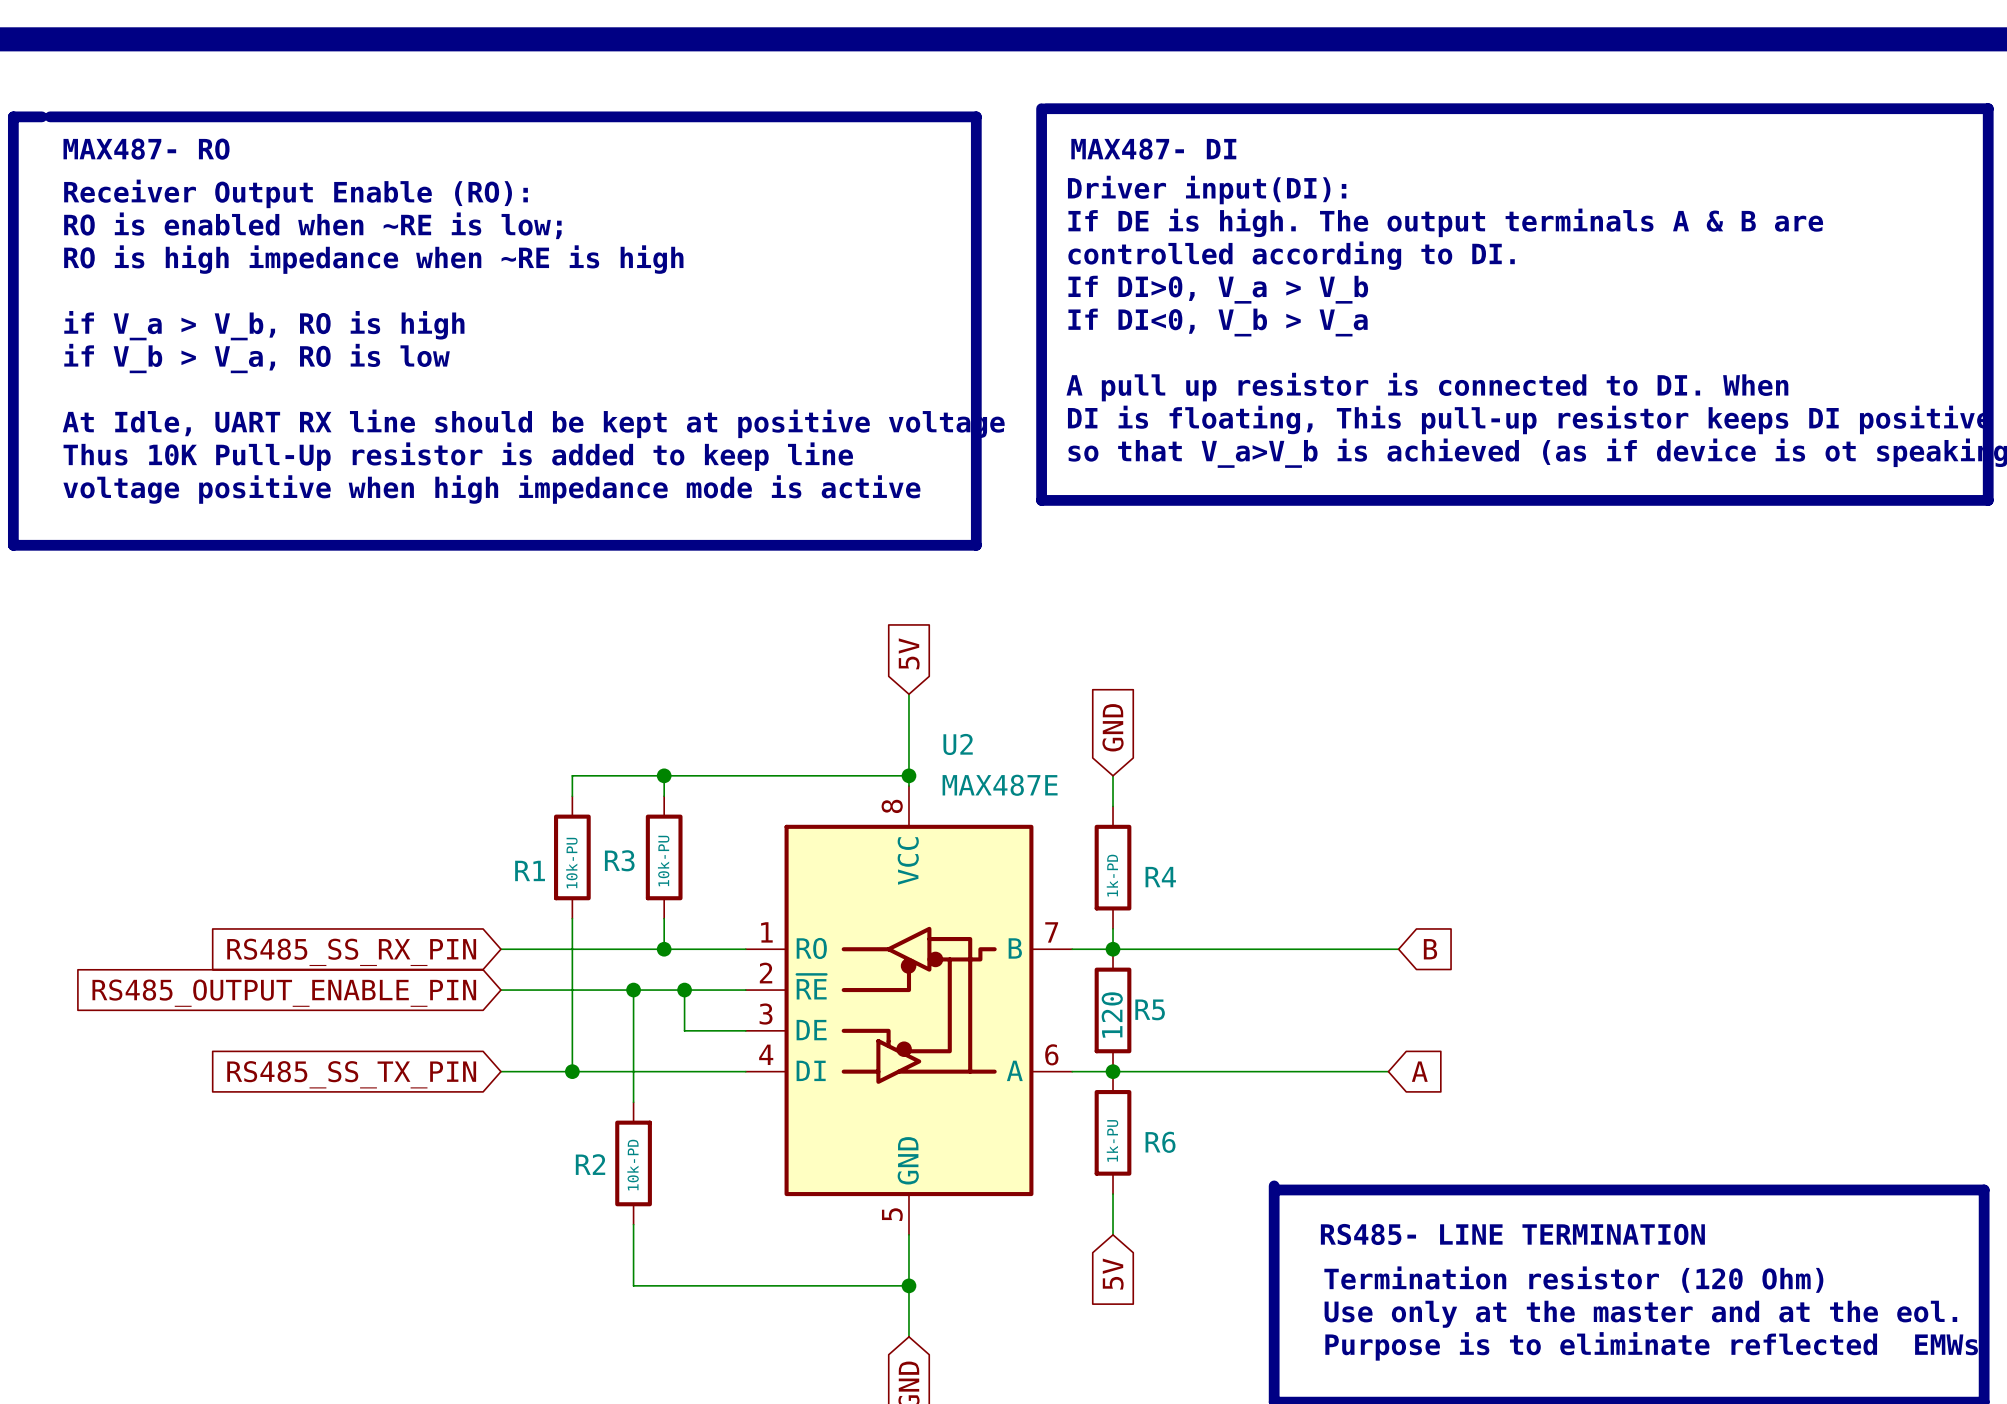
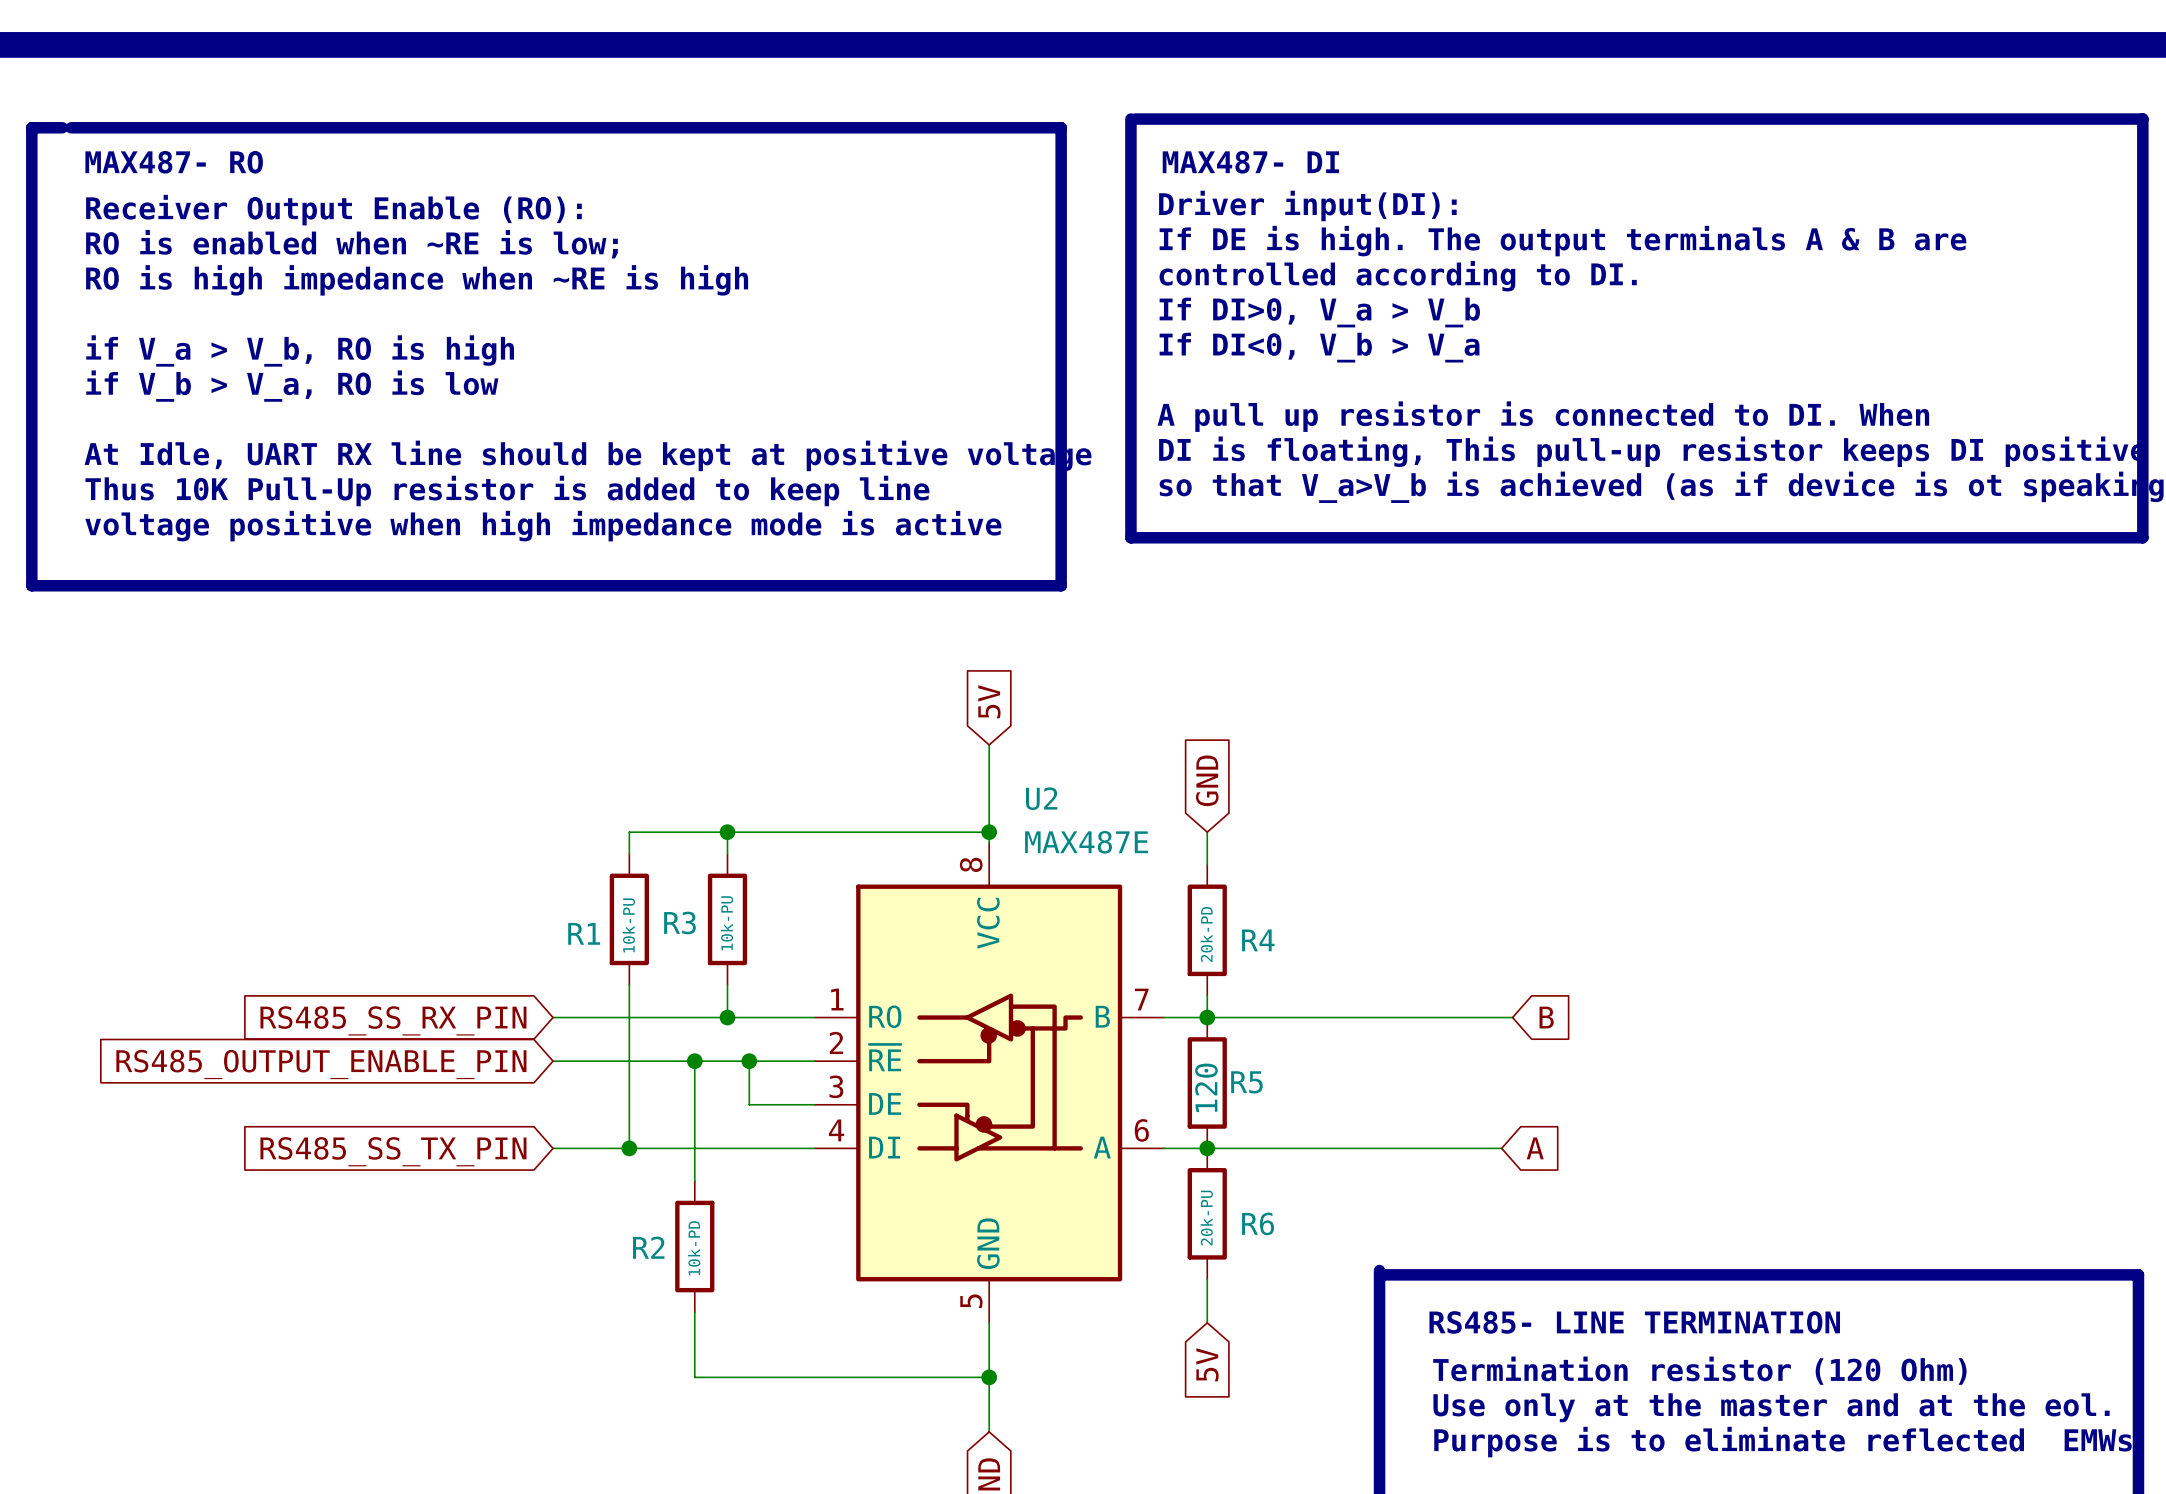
R4 value: 1k-PD (1112, 875) -> 20k-PD (1206, 934)
R6 value: 1k-PU (1112, 1140) -> 20k-PU (1206, 1218)

